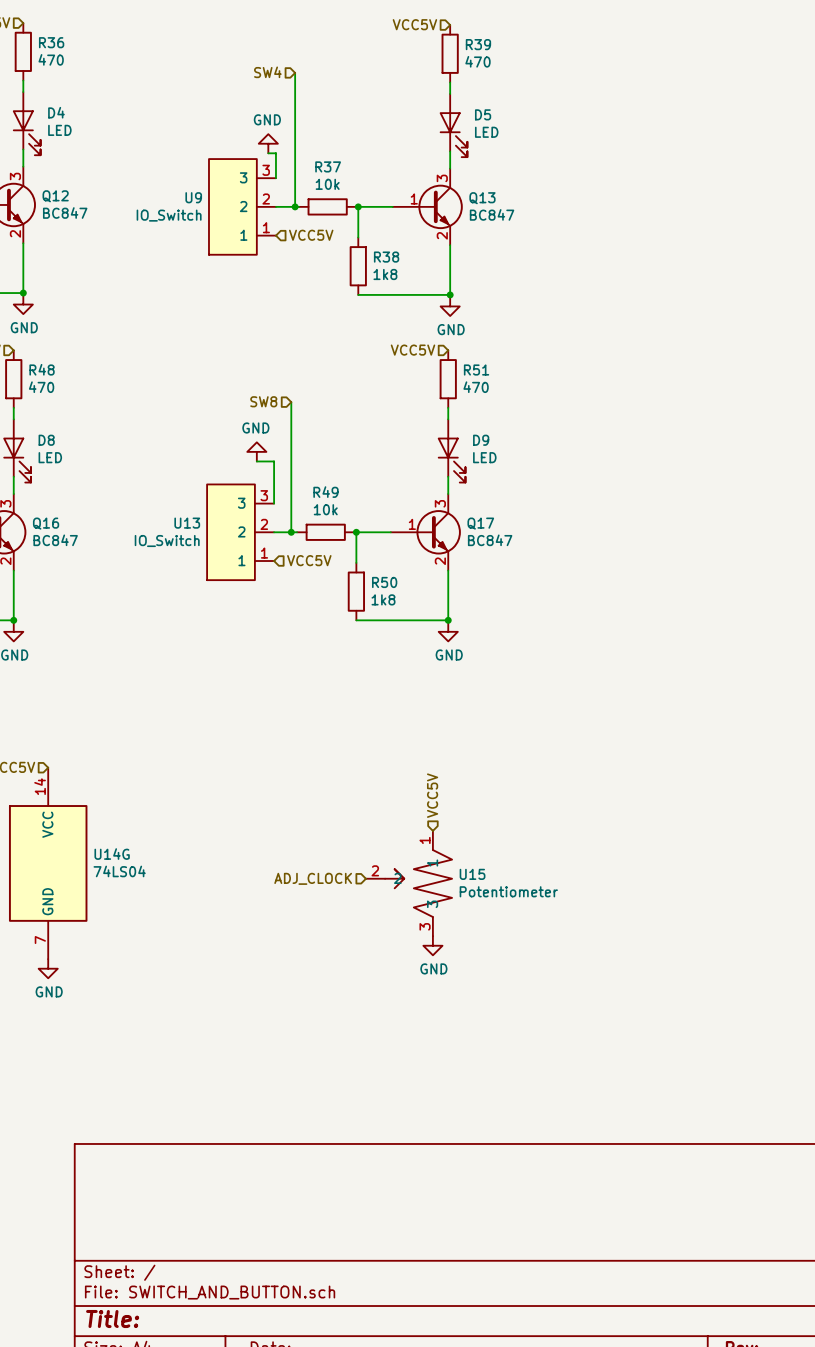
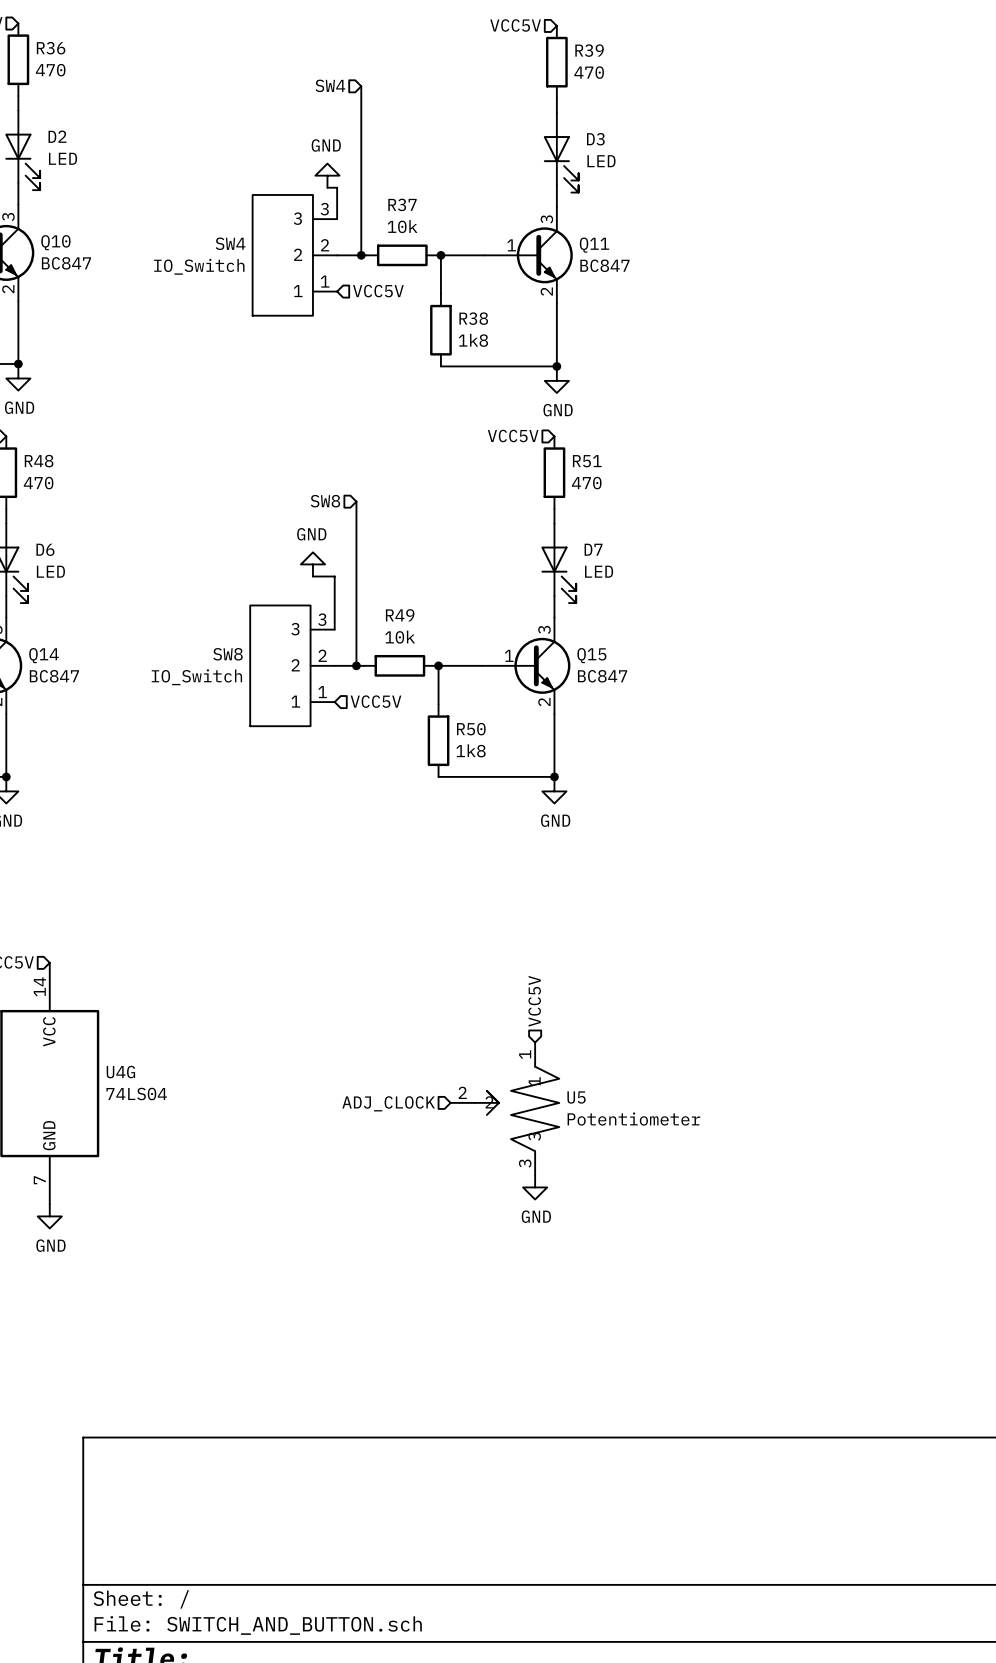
D4 name: D4 (56, 112) -> D2 (57, 136)
D5 name: D5 (483, 114) -> D3 (595, 139)
Q12 name: Q12 (55, 196) -> Q10 (55, 242)
U9 name: U9 (193, 197) -> SW4 (230, 243)
Q13 name: Q13 (482, 198) -> Q11 (594, 245)
D8 name: D8 (46, 440) -> D6 (45, 549)
D9 name: D9 (481, 440) -> D7 (593, 549)
Q16 name: Q16 (46, 523) -> Q14 (44, 655)
U13 name: U13 (187, 523) -> SW8 (228, 654)
Q17 name: Q17 (480, 523) -> Q15 (591, 655)
U14G name: U14G (112, 854) -> U4G (120, 1072)
U15 name: U15 (472, 874) -> U5 (576, 1097)

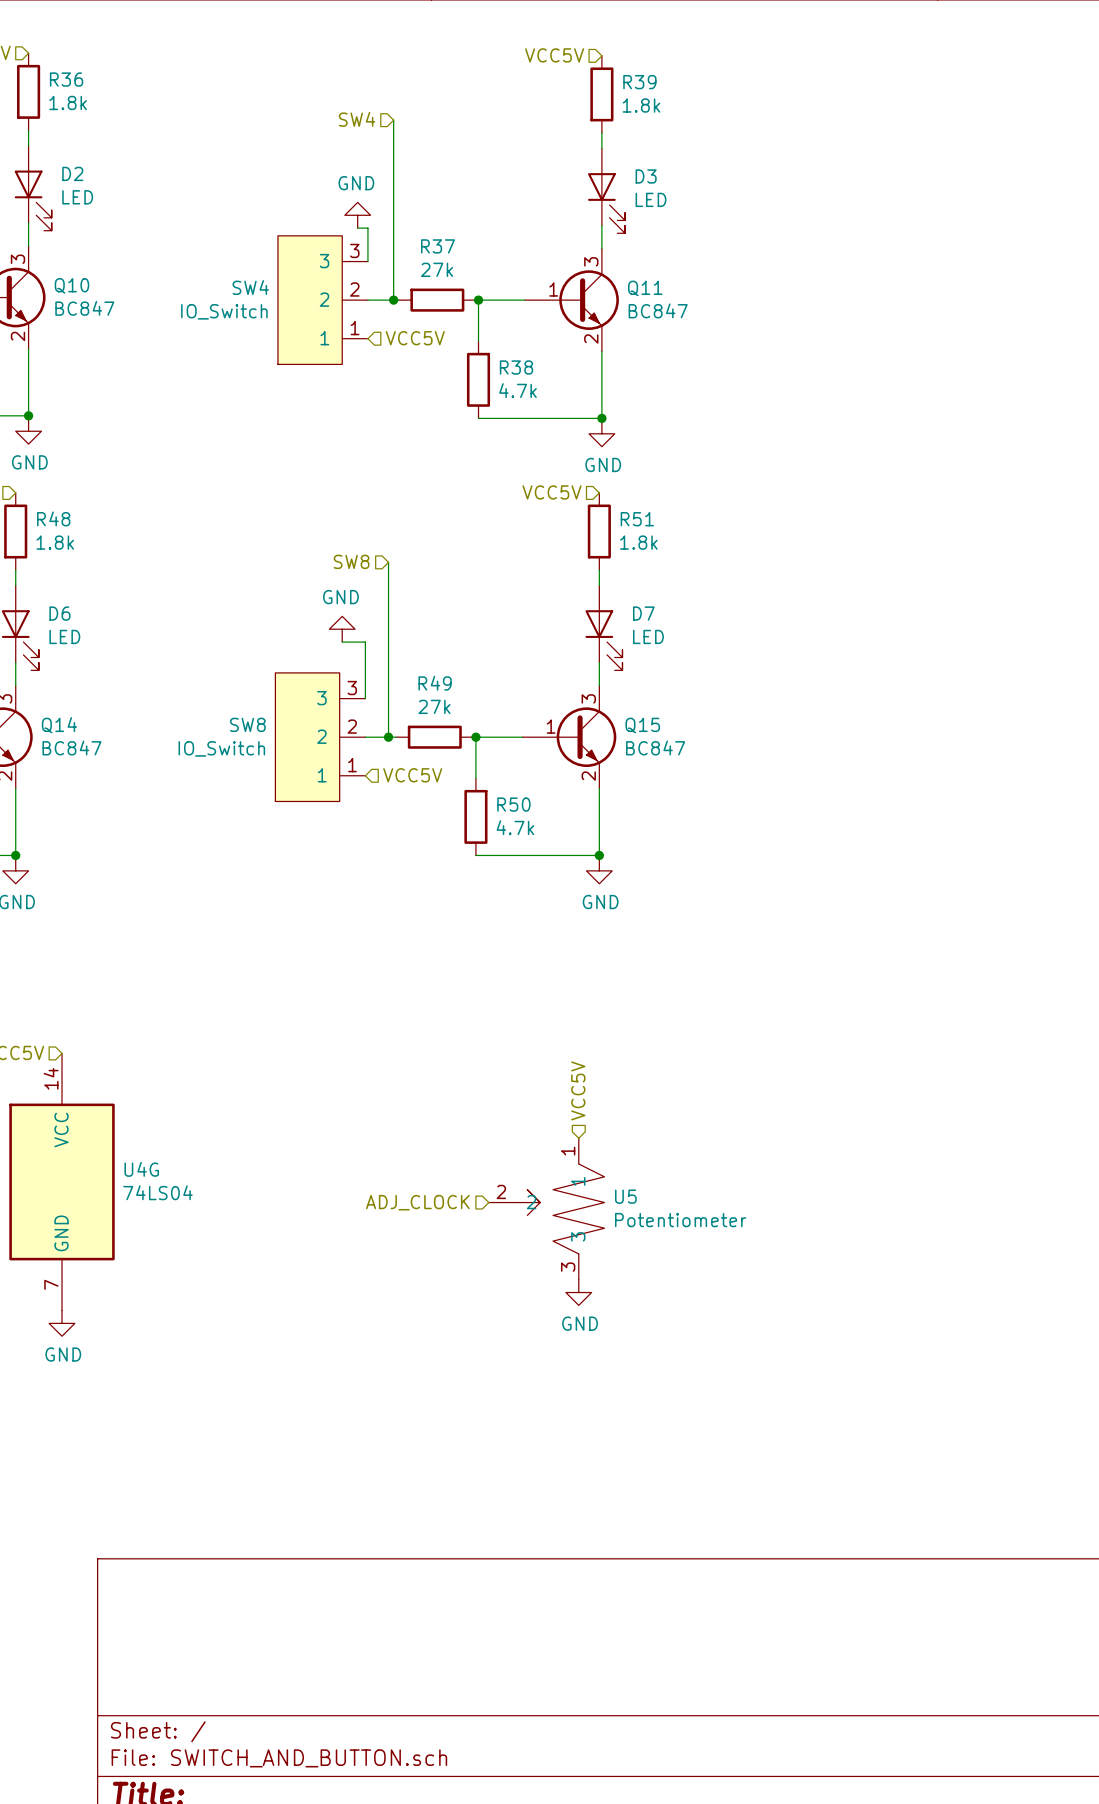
R36 value: 470 (50, 70) -> 1.8k (68, 102)
R39 value: 470 (589, 72) -> 1.8k (641, 105)
R37 value: 10k (402, 226) -> 27k (437, 269)
R38 value: 1k8 (473, 340) -> 4.7k (518, 390)
R48 value: 470 (38, 483) -> 1.8k (55, 542)
R51 value: 470 (586, 483) -> 1.8k (638, 542)
R49 value: 10k (400, 637) -> 27k (434, 706)
R50 value: 1k8 (471, 750) -> 4.7k (515, 827)

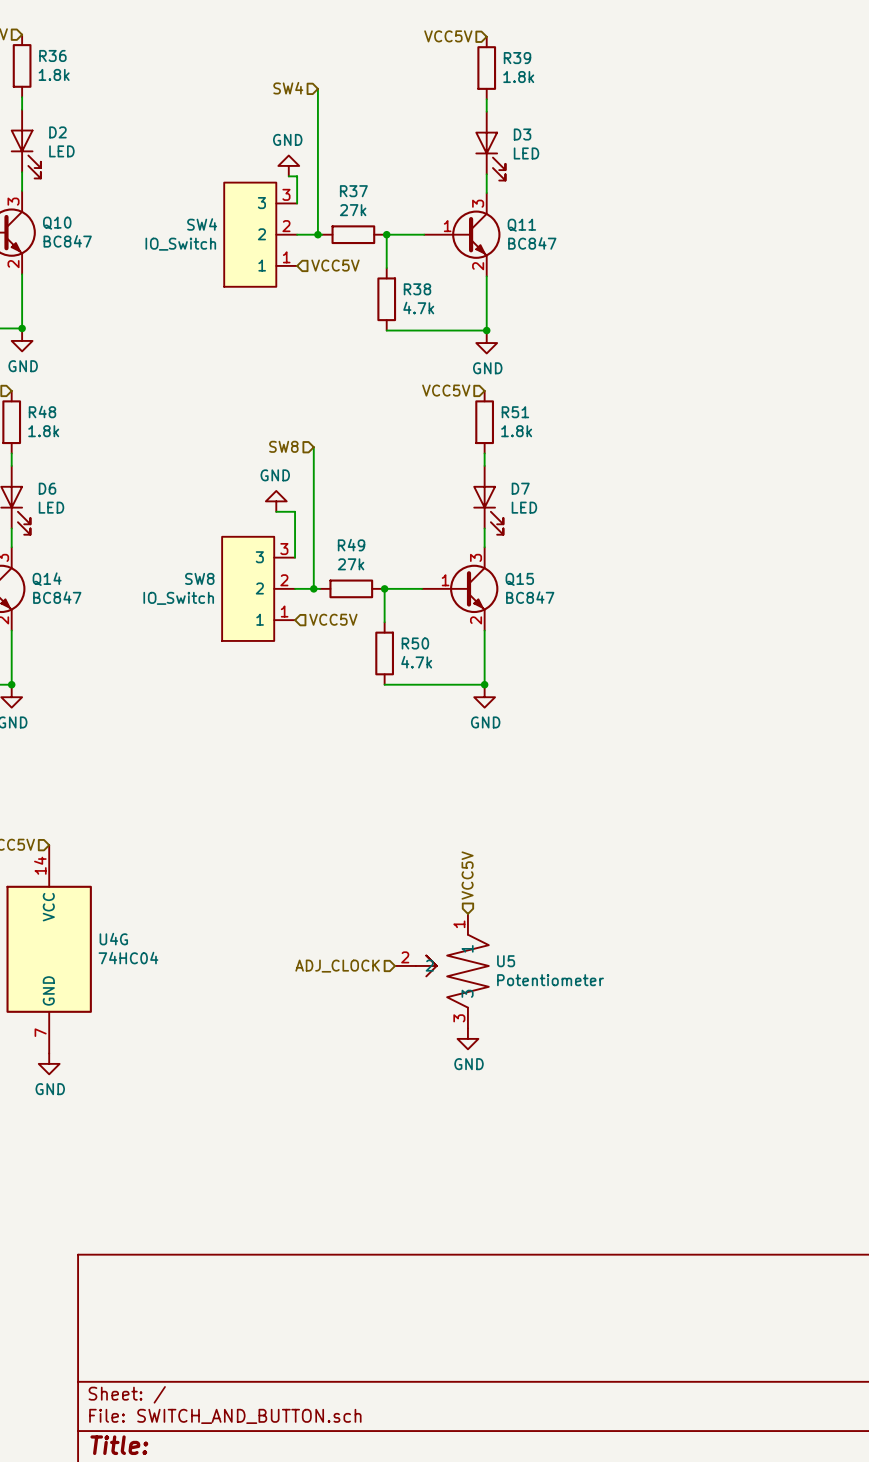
U4G value: 74LS04 (157, 1192) -> 74HC04 (128, 958)

